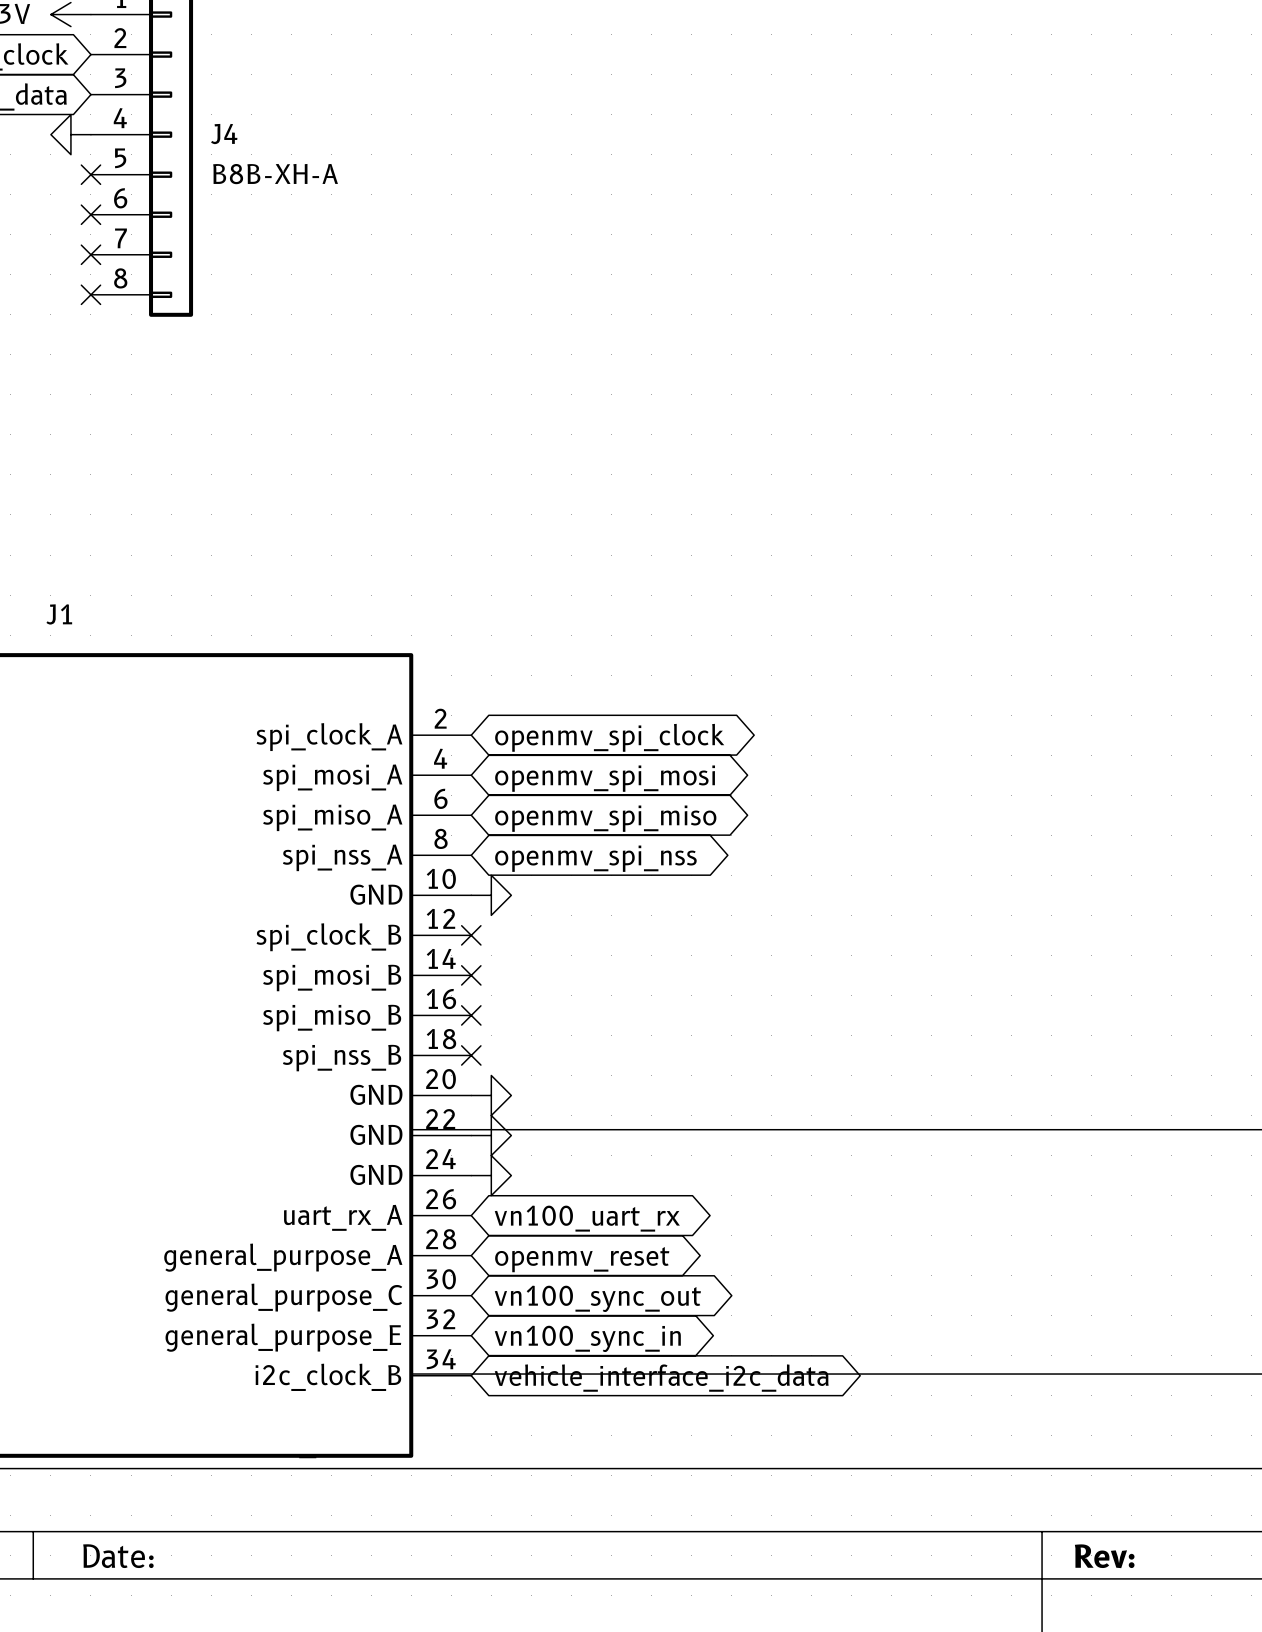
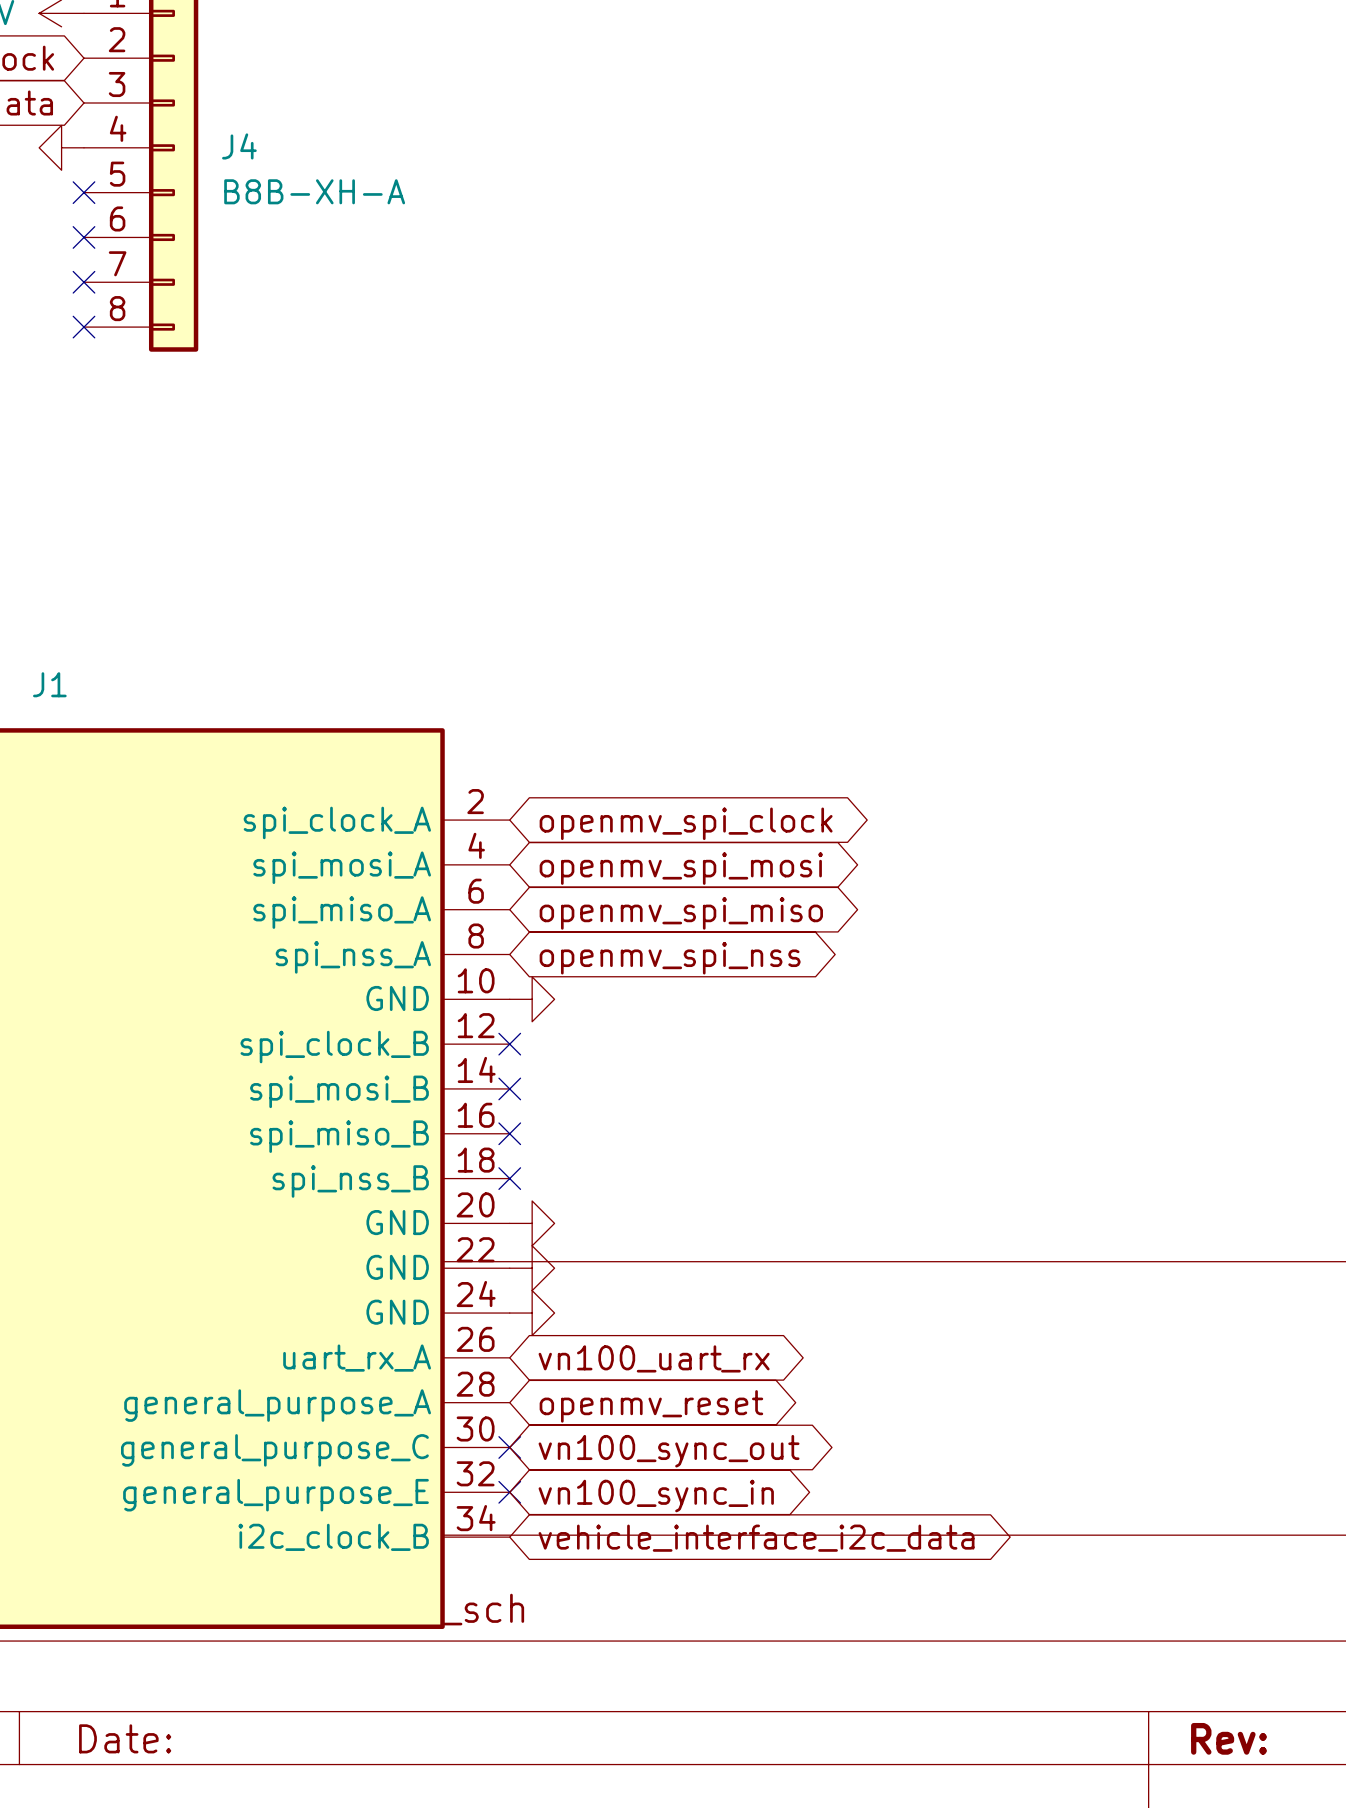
no-connect mark: none -> (509, 1447)
no-connect mark: none -> (509, 1492)

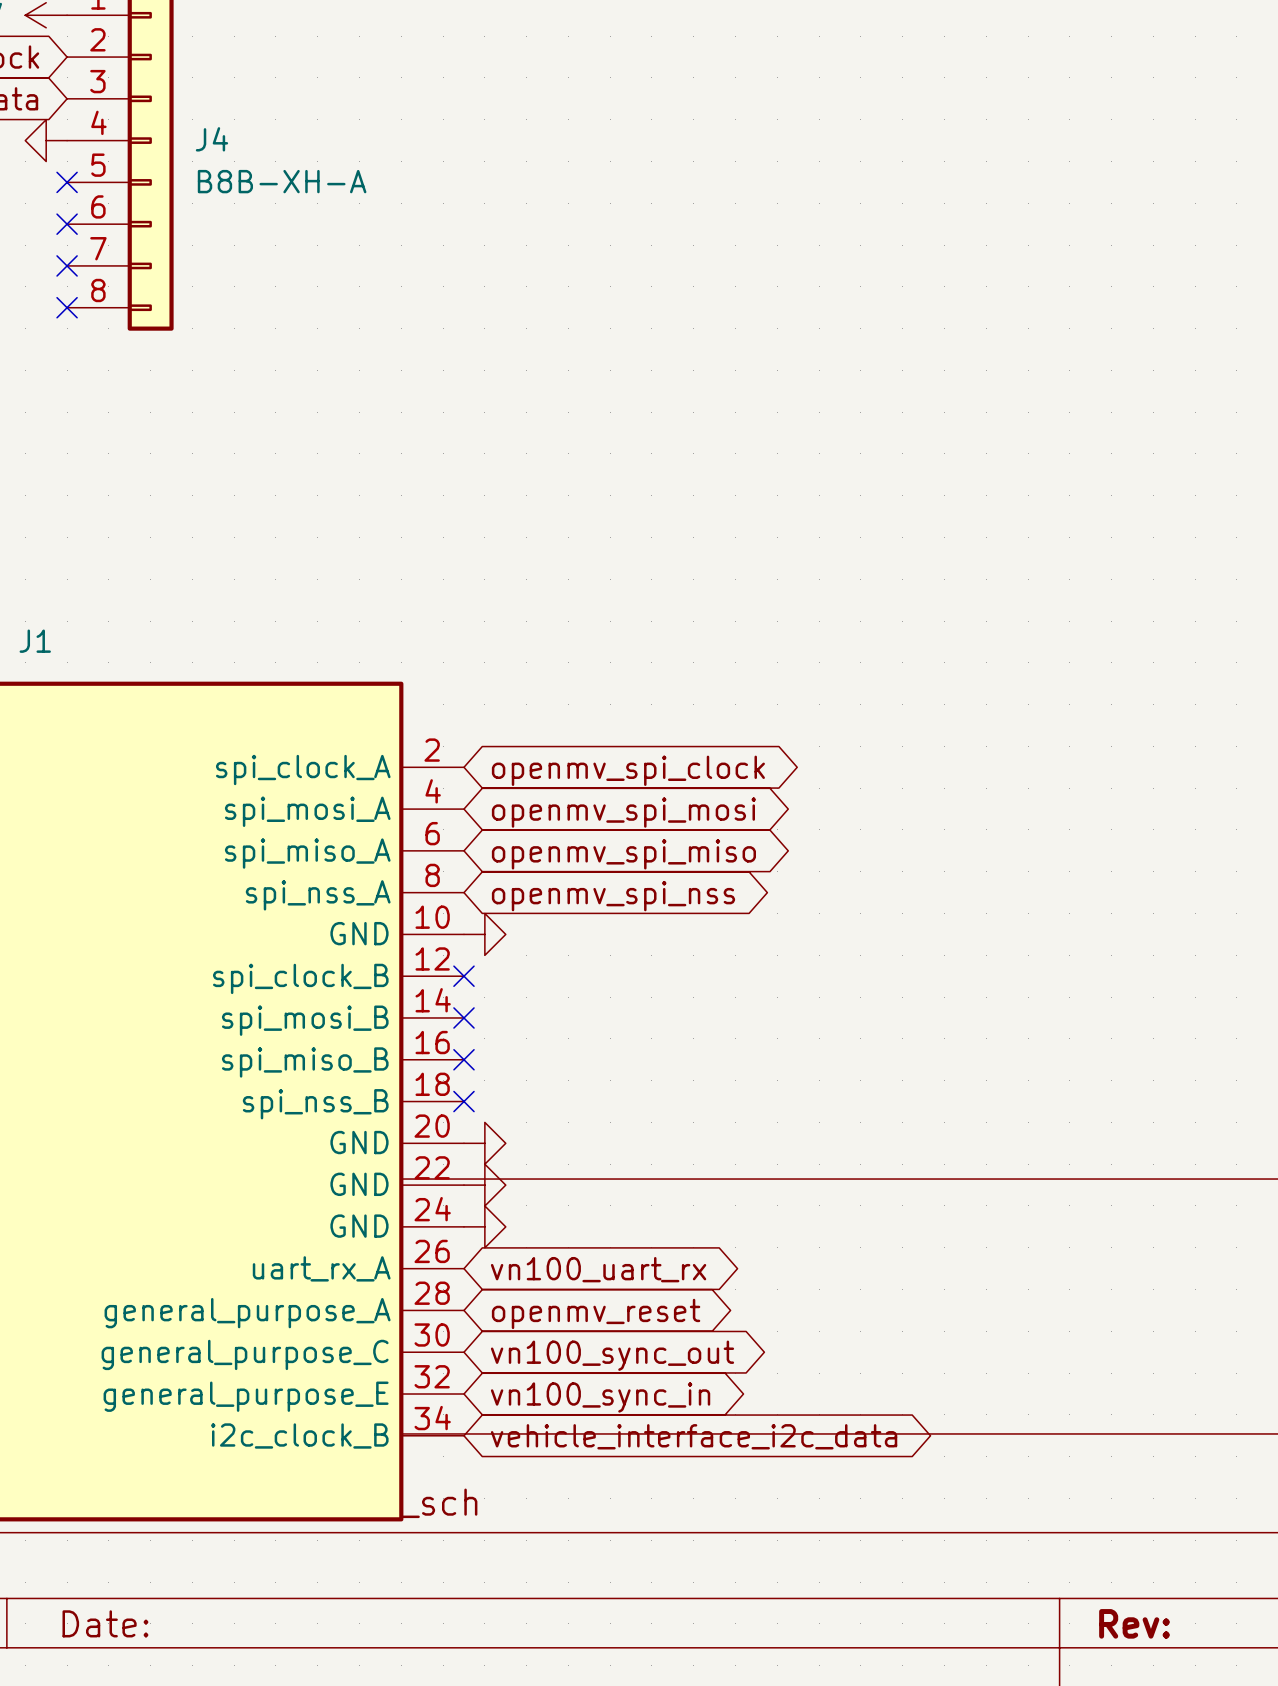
no-connect mark: (509, 1447) -> none
no-connect mark: (509, 1492) -> none

